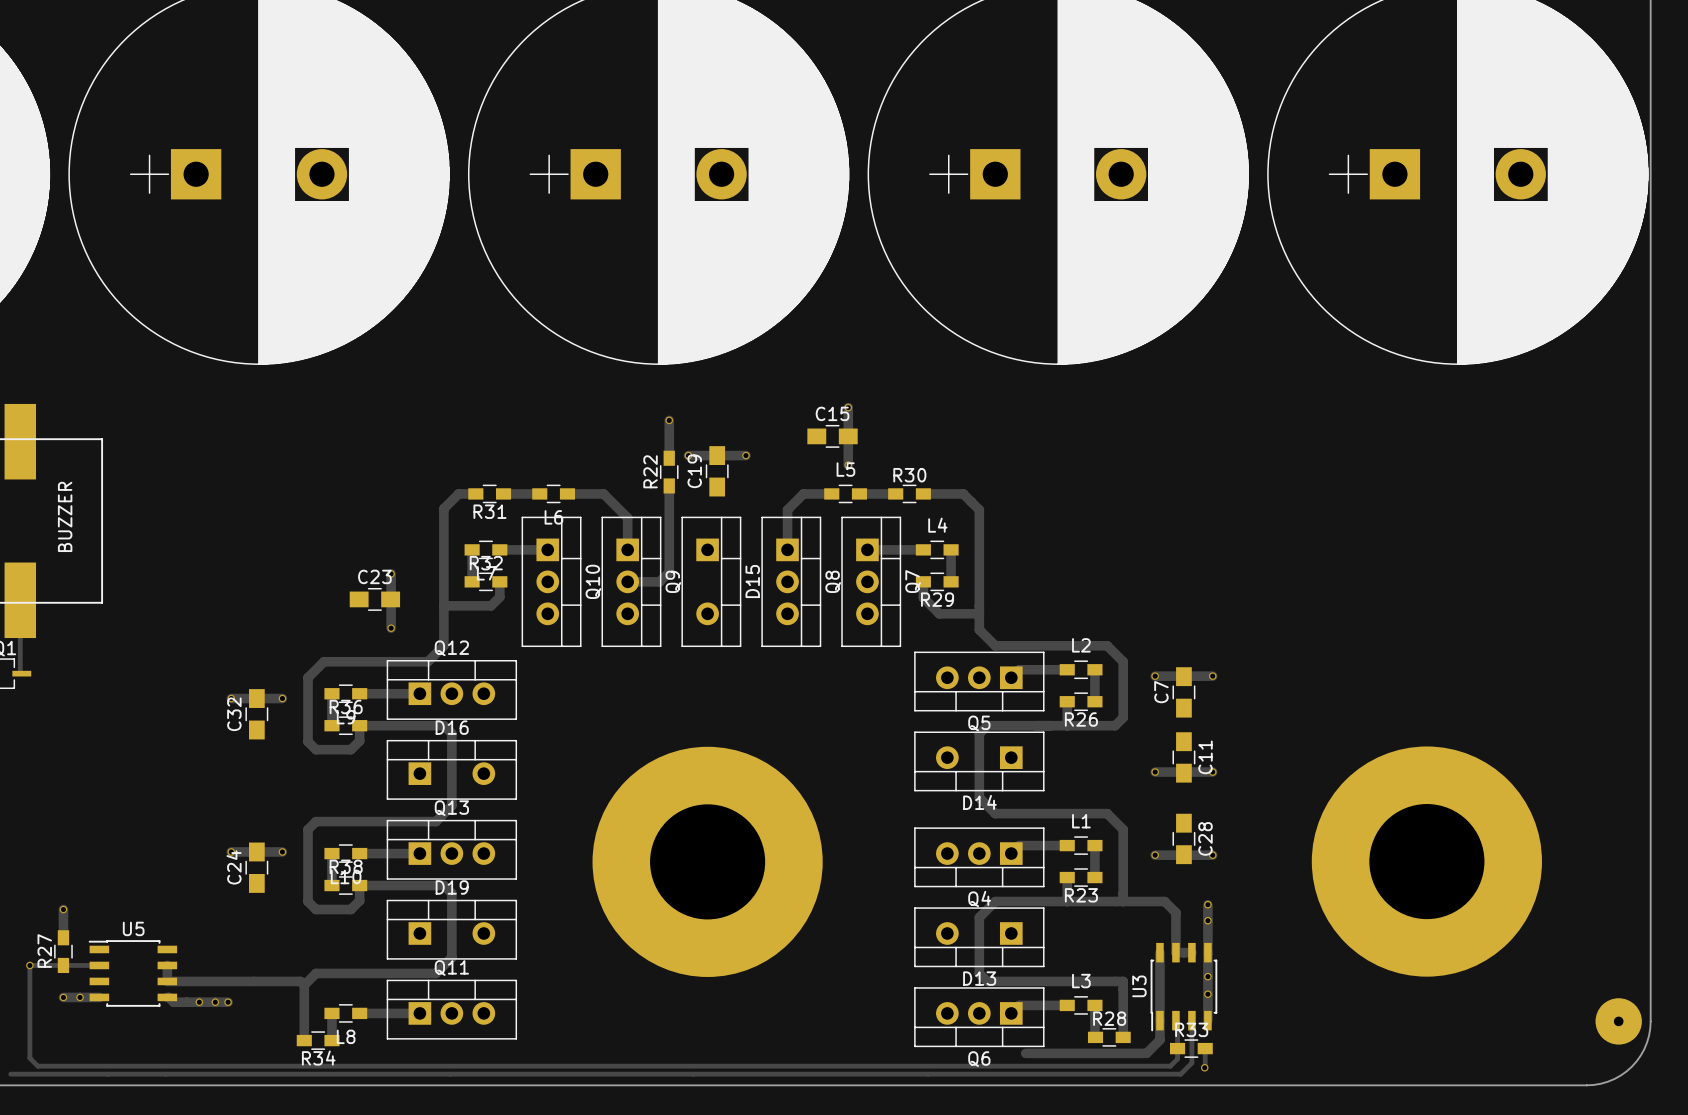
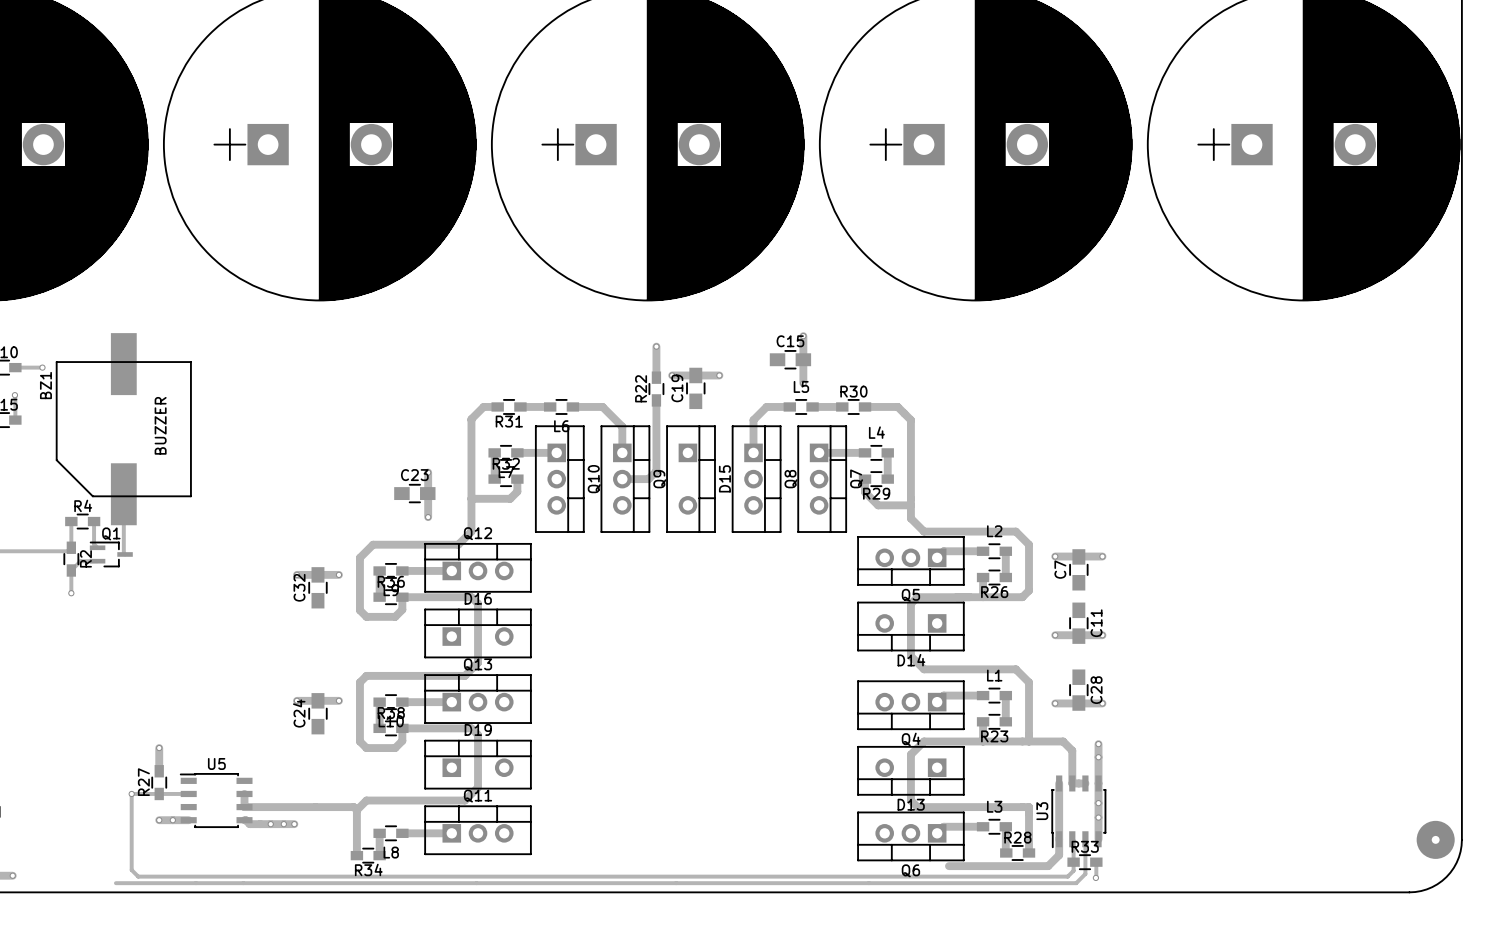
part: (707, 861) -> none
part: (1426, 861) -> none

